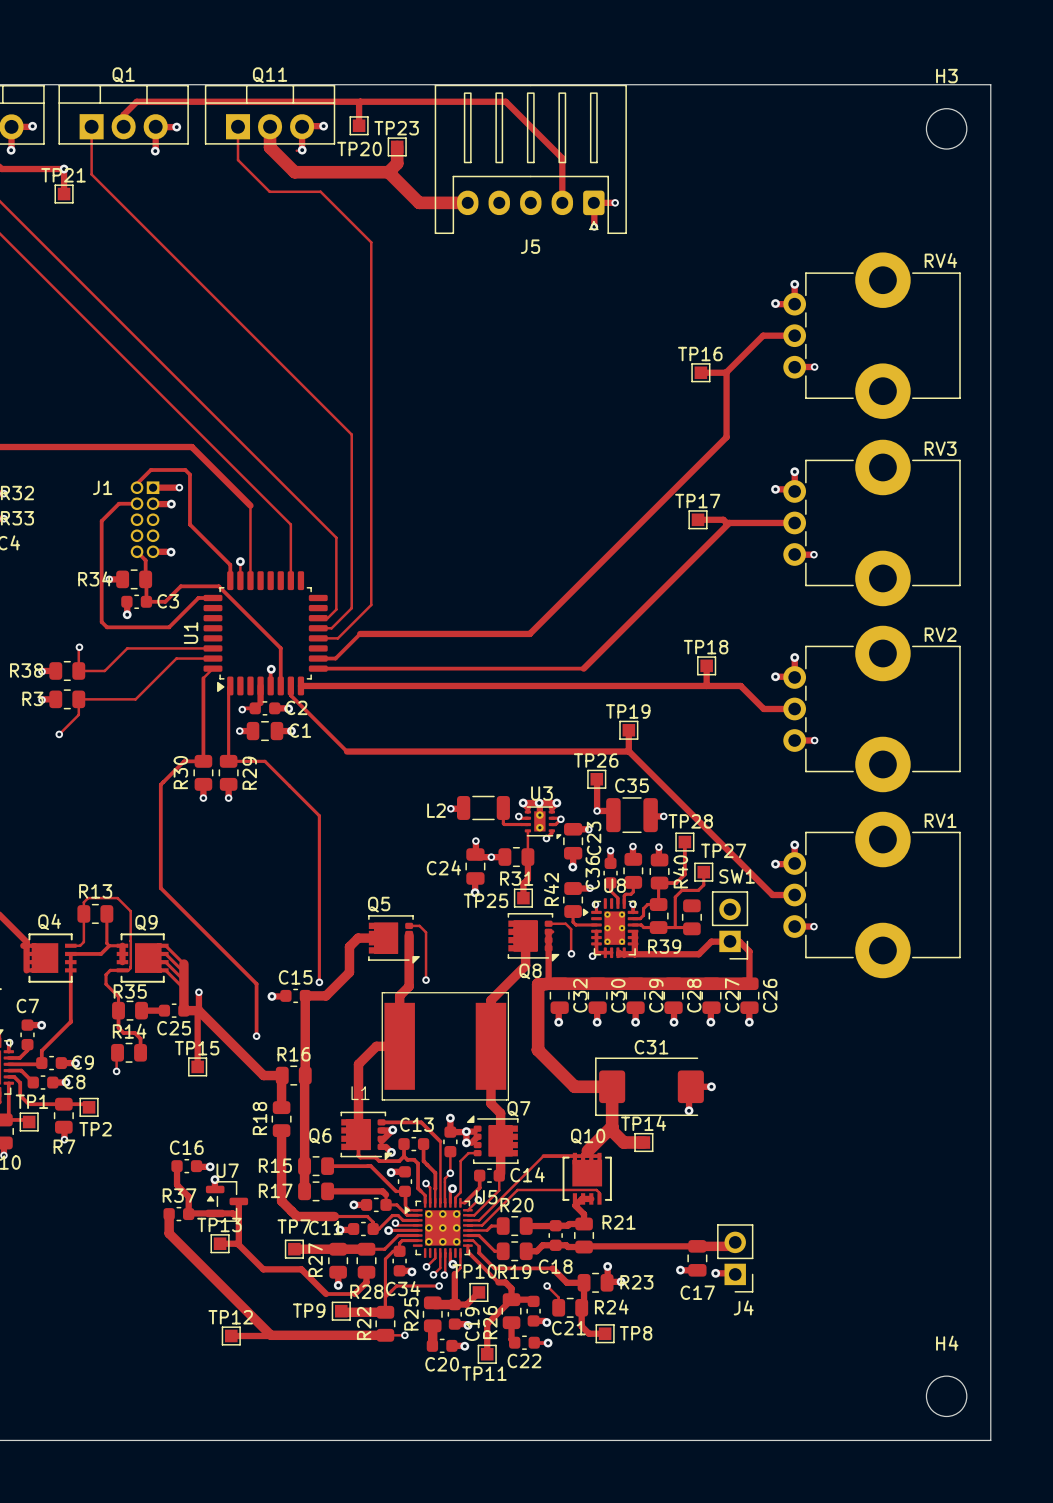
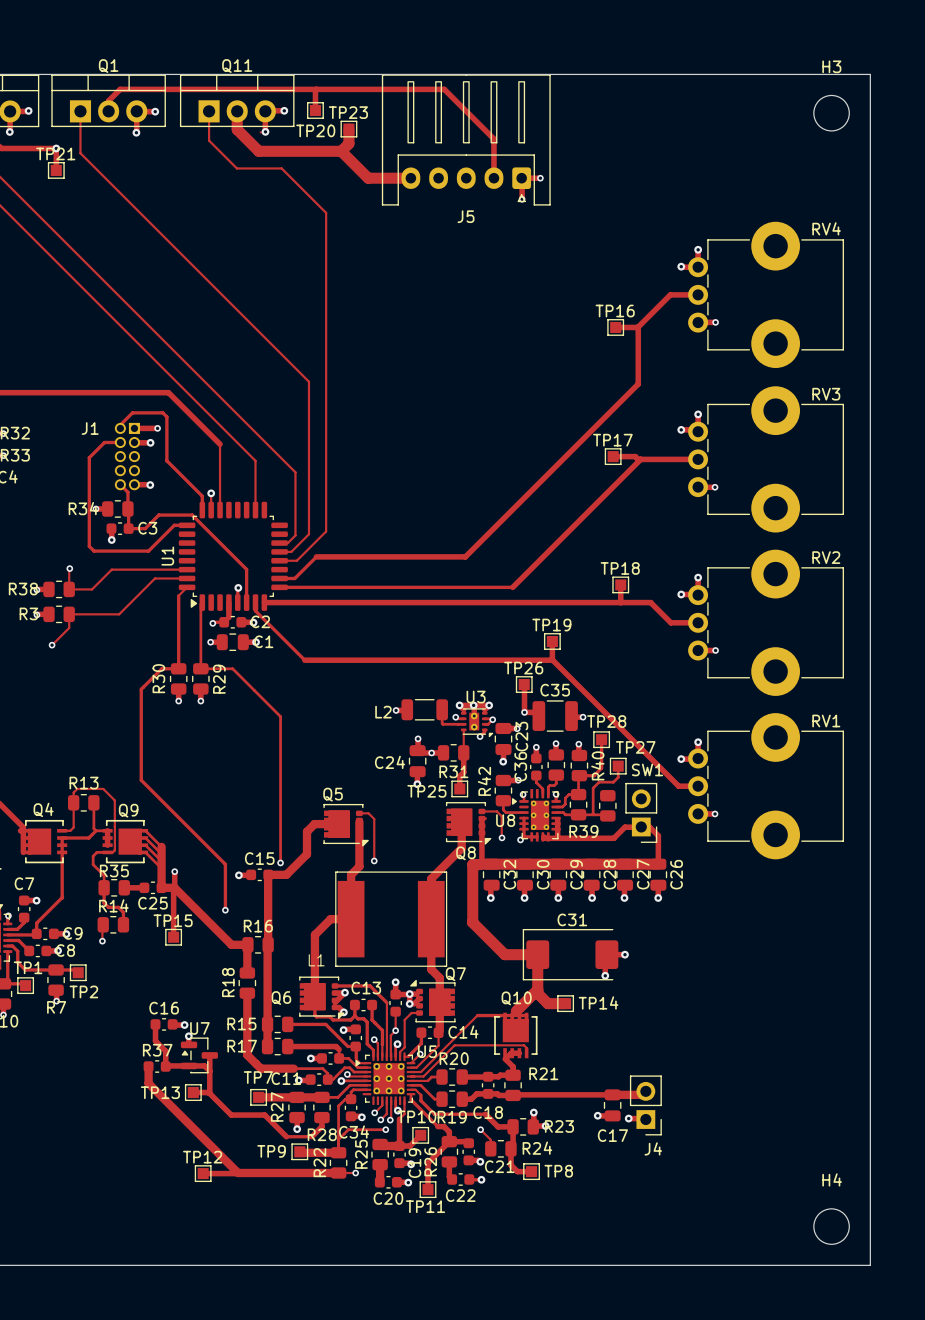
U8 name position: U8 (615, 885) -> U8 (505, 820)
TP14 name position: TP14 (643, 1123) -> TP14 (598, 1002)
TP13 name position: TP13 (219, 1225) -> TP13 (160, 1092)

